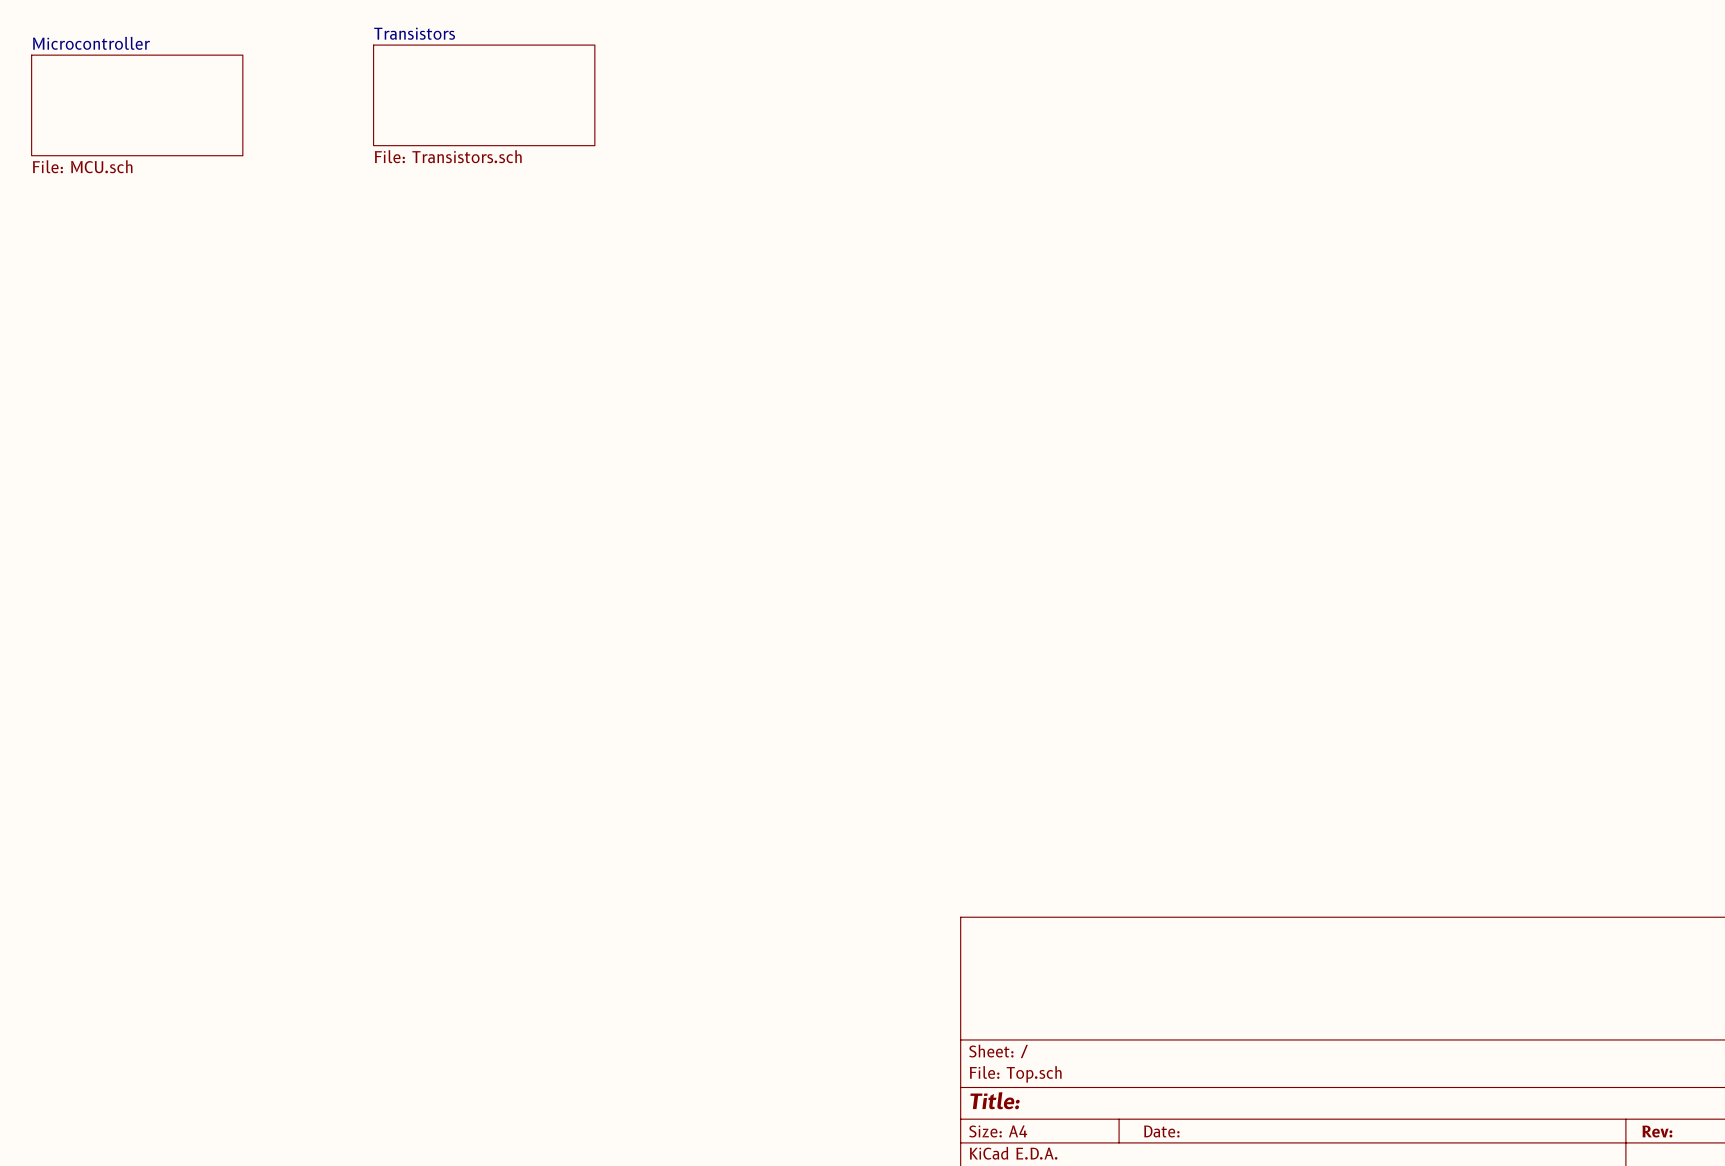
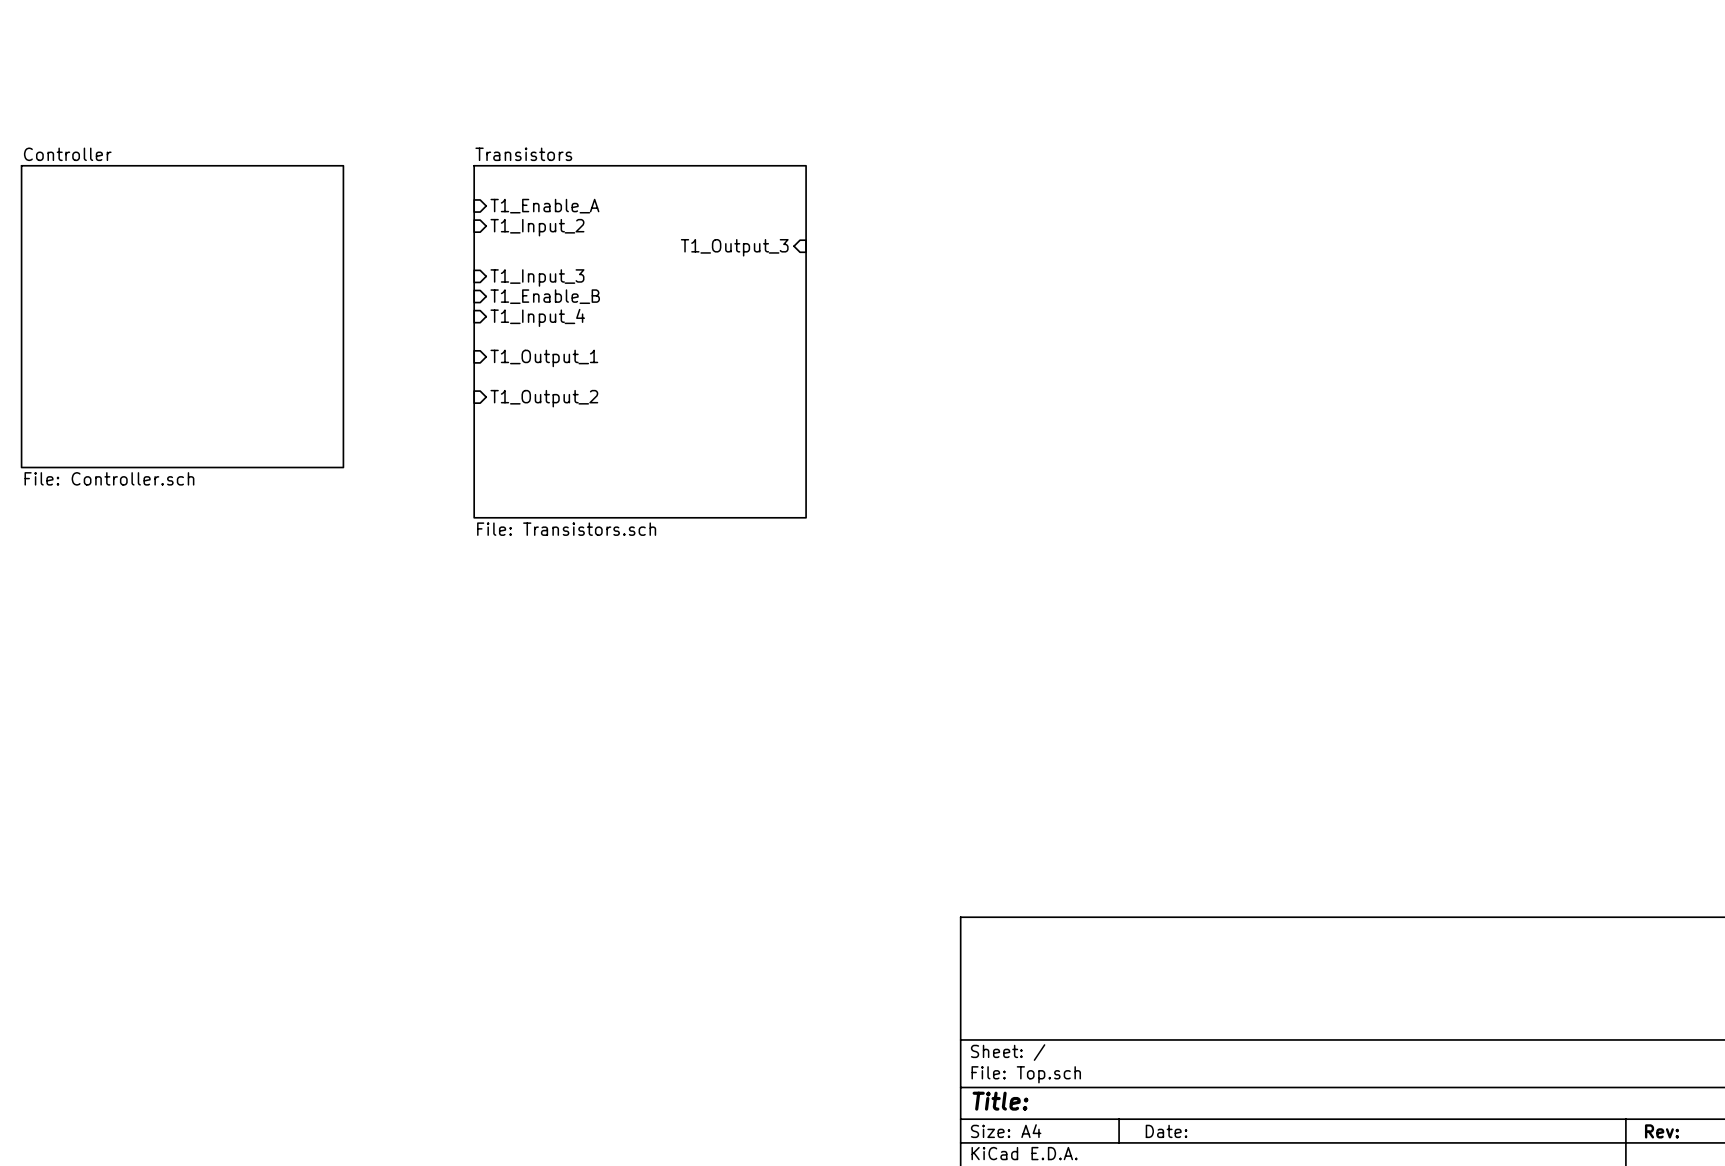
sheet Transistors: File: Transistors.sch (484, 95) -> none
sheet Microcontroller: File: MCU.sch (137, 105) -> none
sheet pin: none -> T1_Enable_A (544, 206)
sheet pin: none -> T1_Input_2 (537, 227)
sheet pin: none -> T1_Output_3 (734, 247)
sheet pin: none -> T1_Input_3 (537, 277)
sheet pin: none -> T1_Enable_B (545, 296)
sheet Controller: none -> File: Controller.sch (182, 316)
sheet pin: none -> T1_Input_4 (537, 317)
sheet Transistors: none -> File: Transistors.sch (640, 341)
sheet pin: none -> T1_Output_1 (544, 358)
sheet pin: none -> T1_Output_2 (544, 398)

